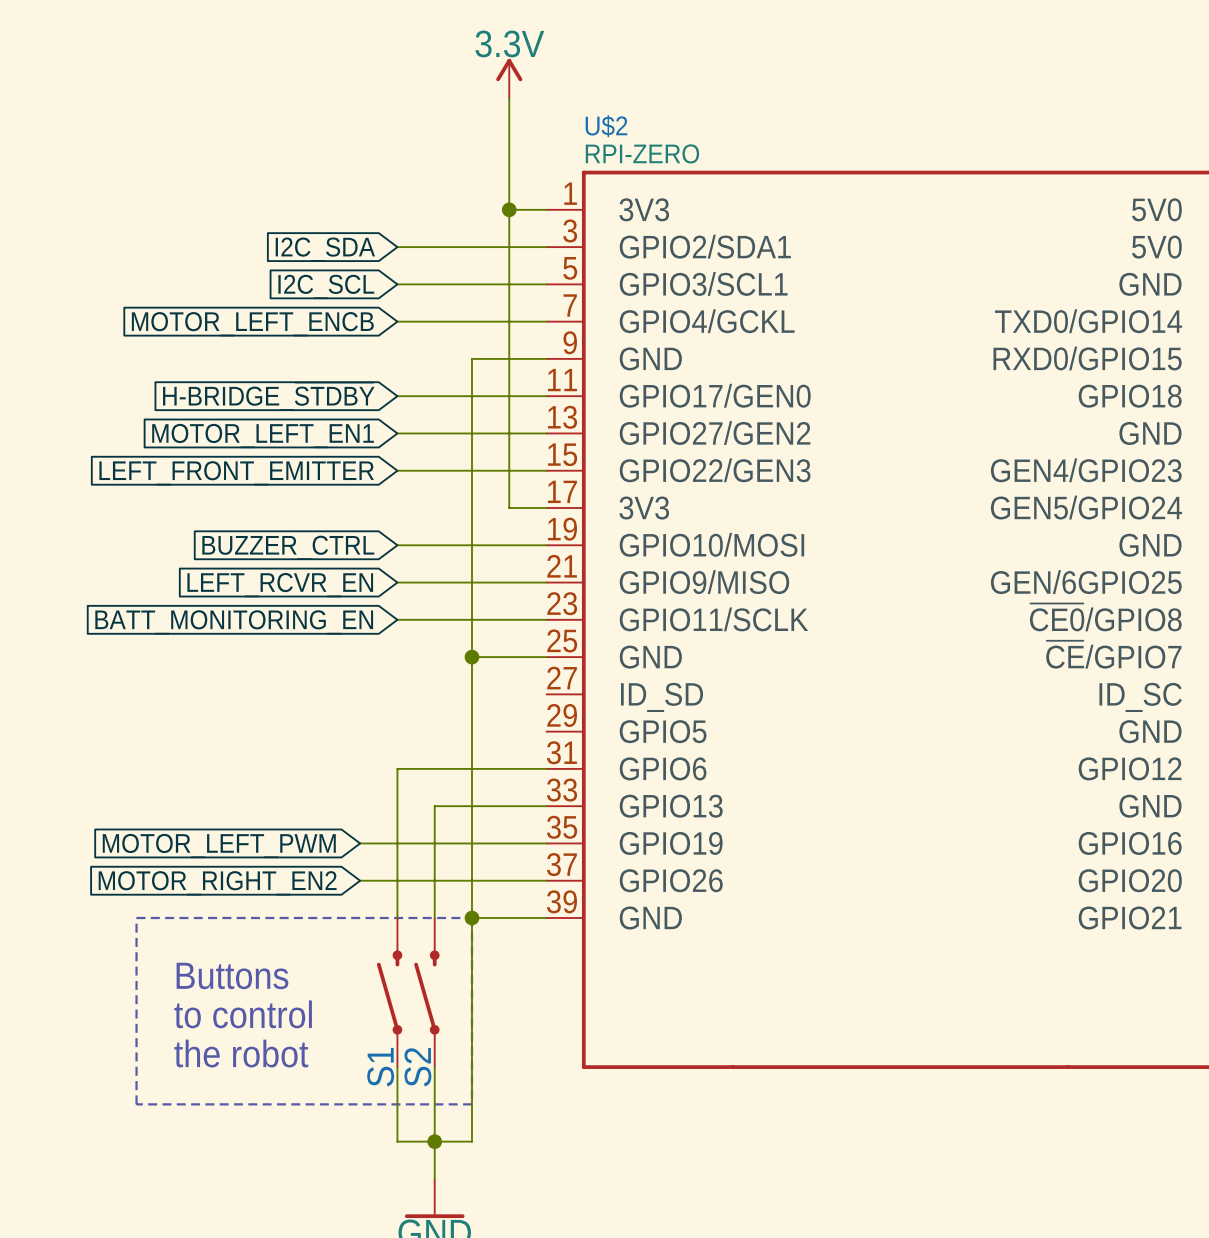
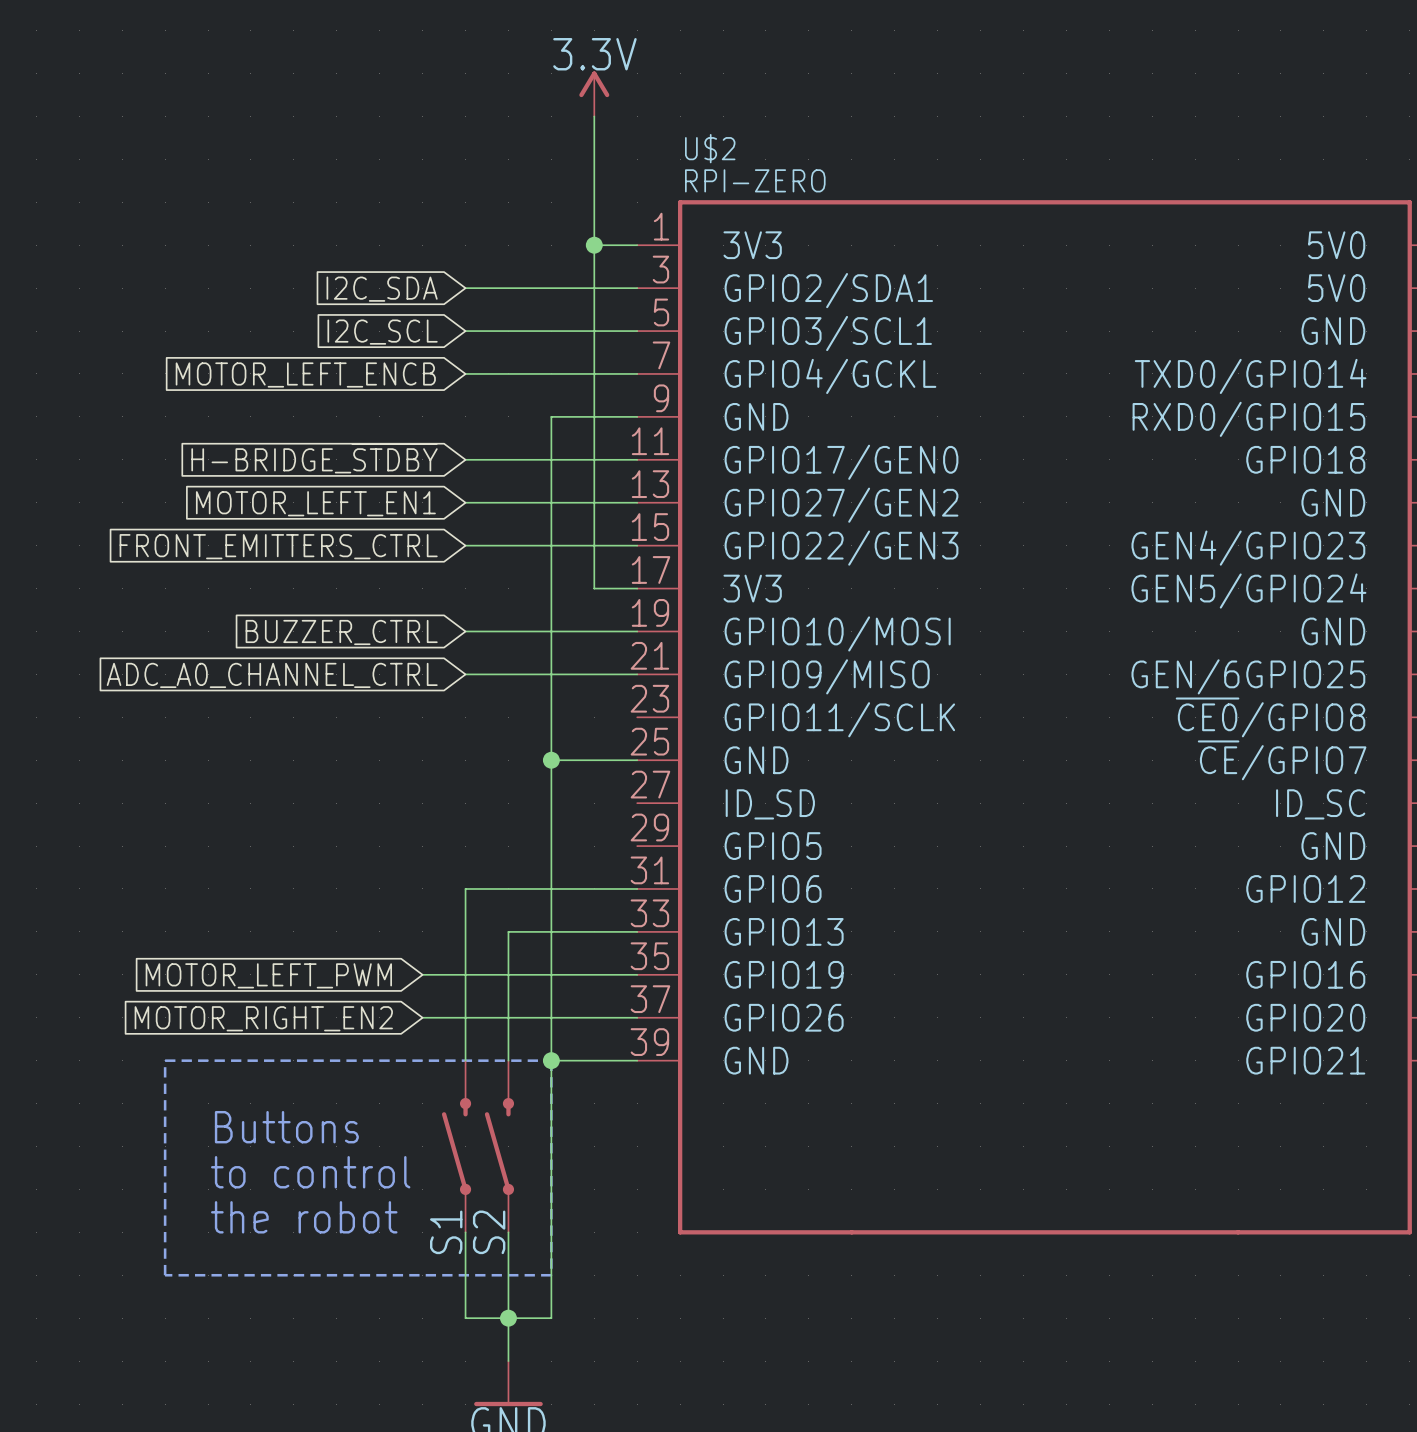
global label: LEFT_FRONT_EMITTER (236, 473) -> FRONT_EMITTERS_CTRL (278, 546)
global label: LEFT_RCVR_EN (280, 585) -> ADC_A0_CHANNEL_CTRL (272, 675)
wire: (397, 619) (546, 619) -> none
global label: BATT_MONITORING_EN (234, 622) -> none

